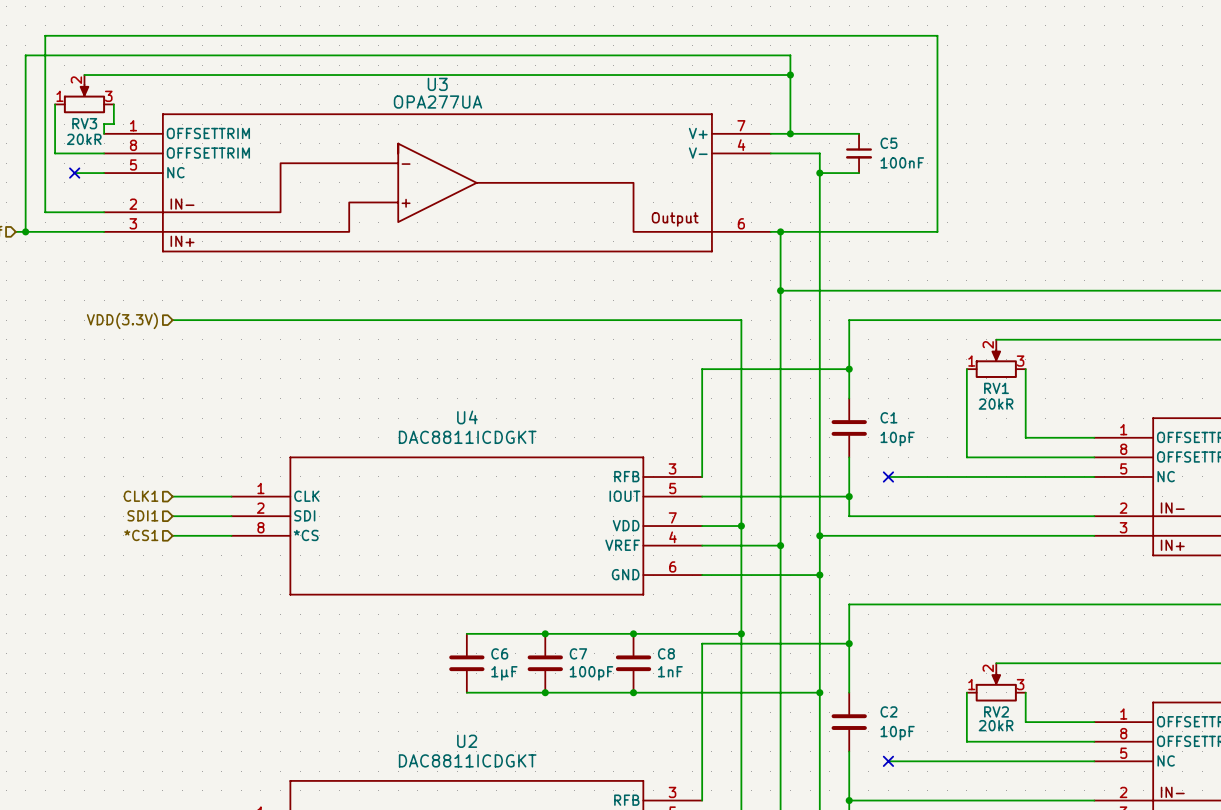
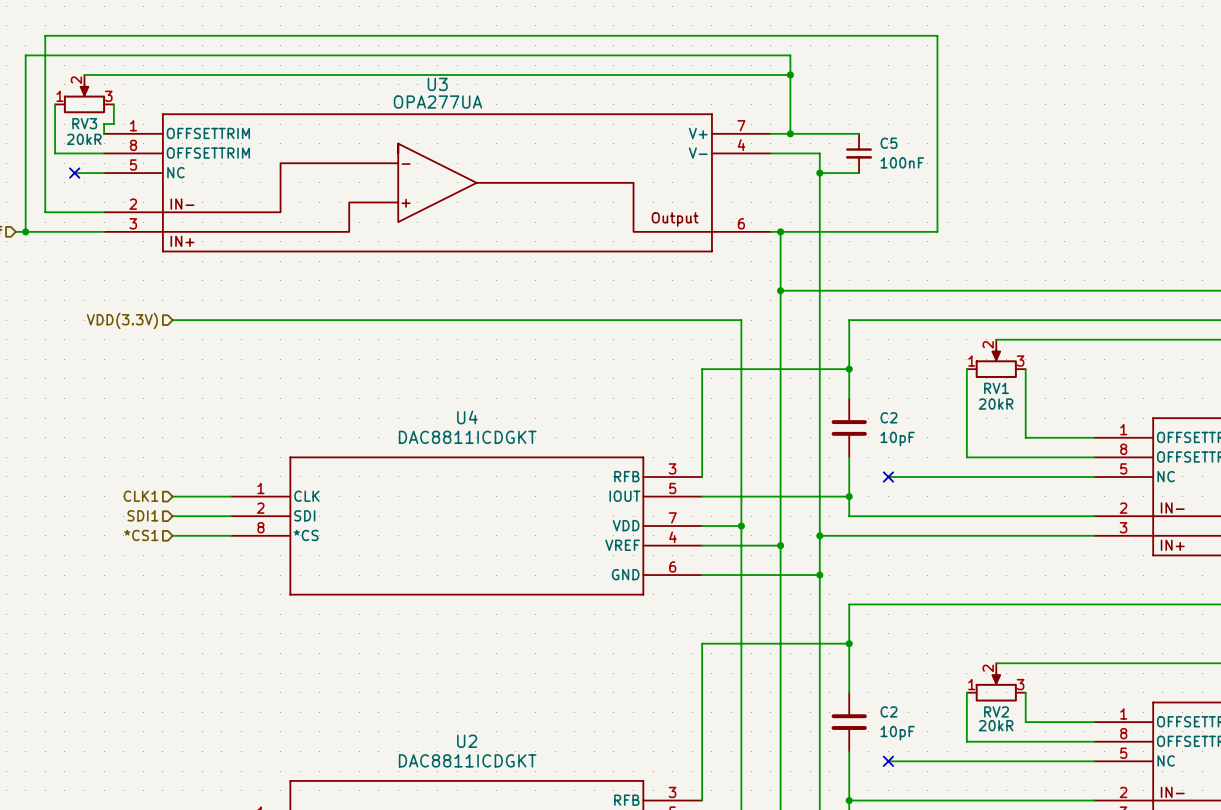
C1 name: C1 (888, 417) -> C2 (888, 417)
wire: (466, 633) (741, 633) -> none
junction: (545, 633) -> none
junction: (633, 633) -> none
junction: (741, 633) -> none
C6: 1µF (466, 663) -> none
C7: 100pF (545, 663) -> none
C8: 1nF (633, 663) -> none
wire: (466, 692) (819, 692) -> none
junction: (545, 692) -> none
junction: (633, 692) -> none
junction: (819, 692) -> none

